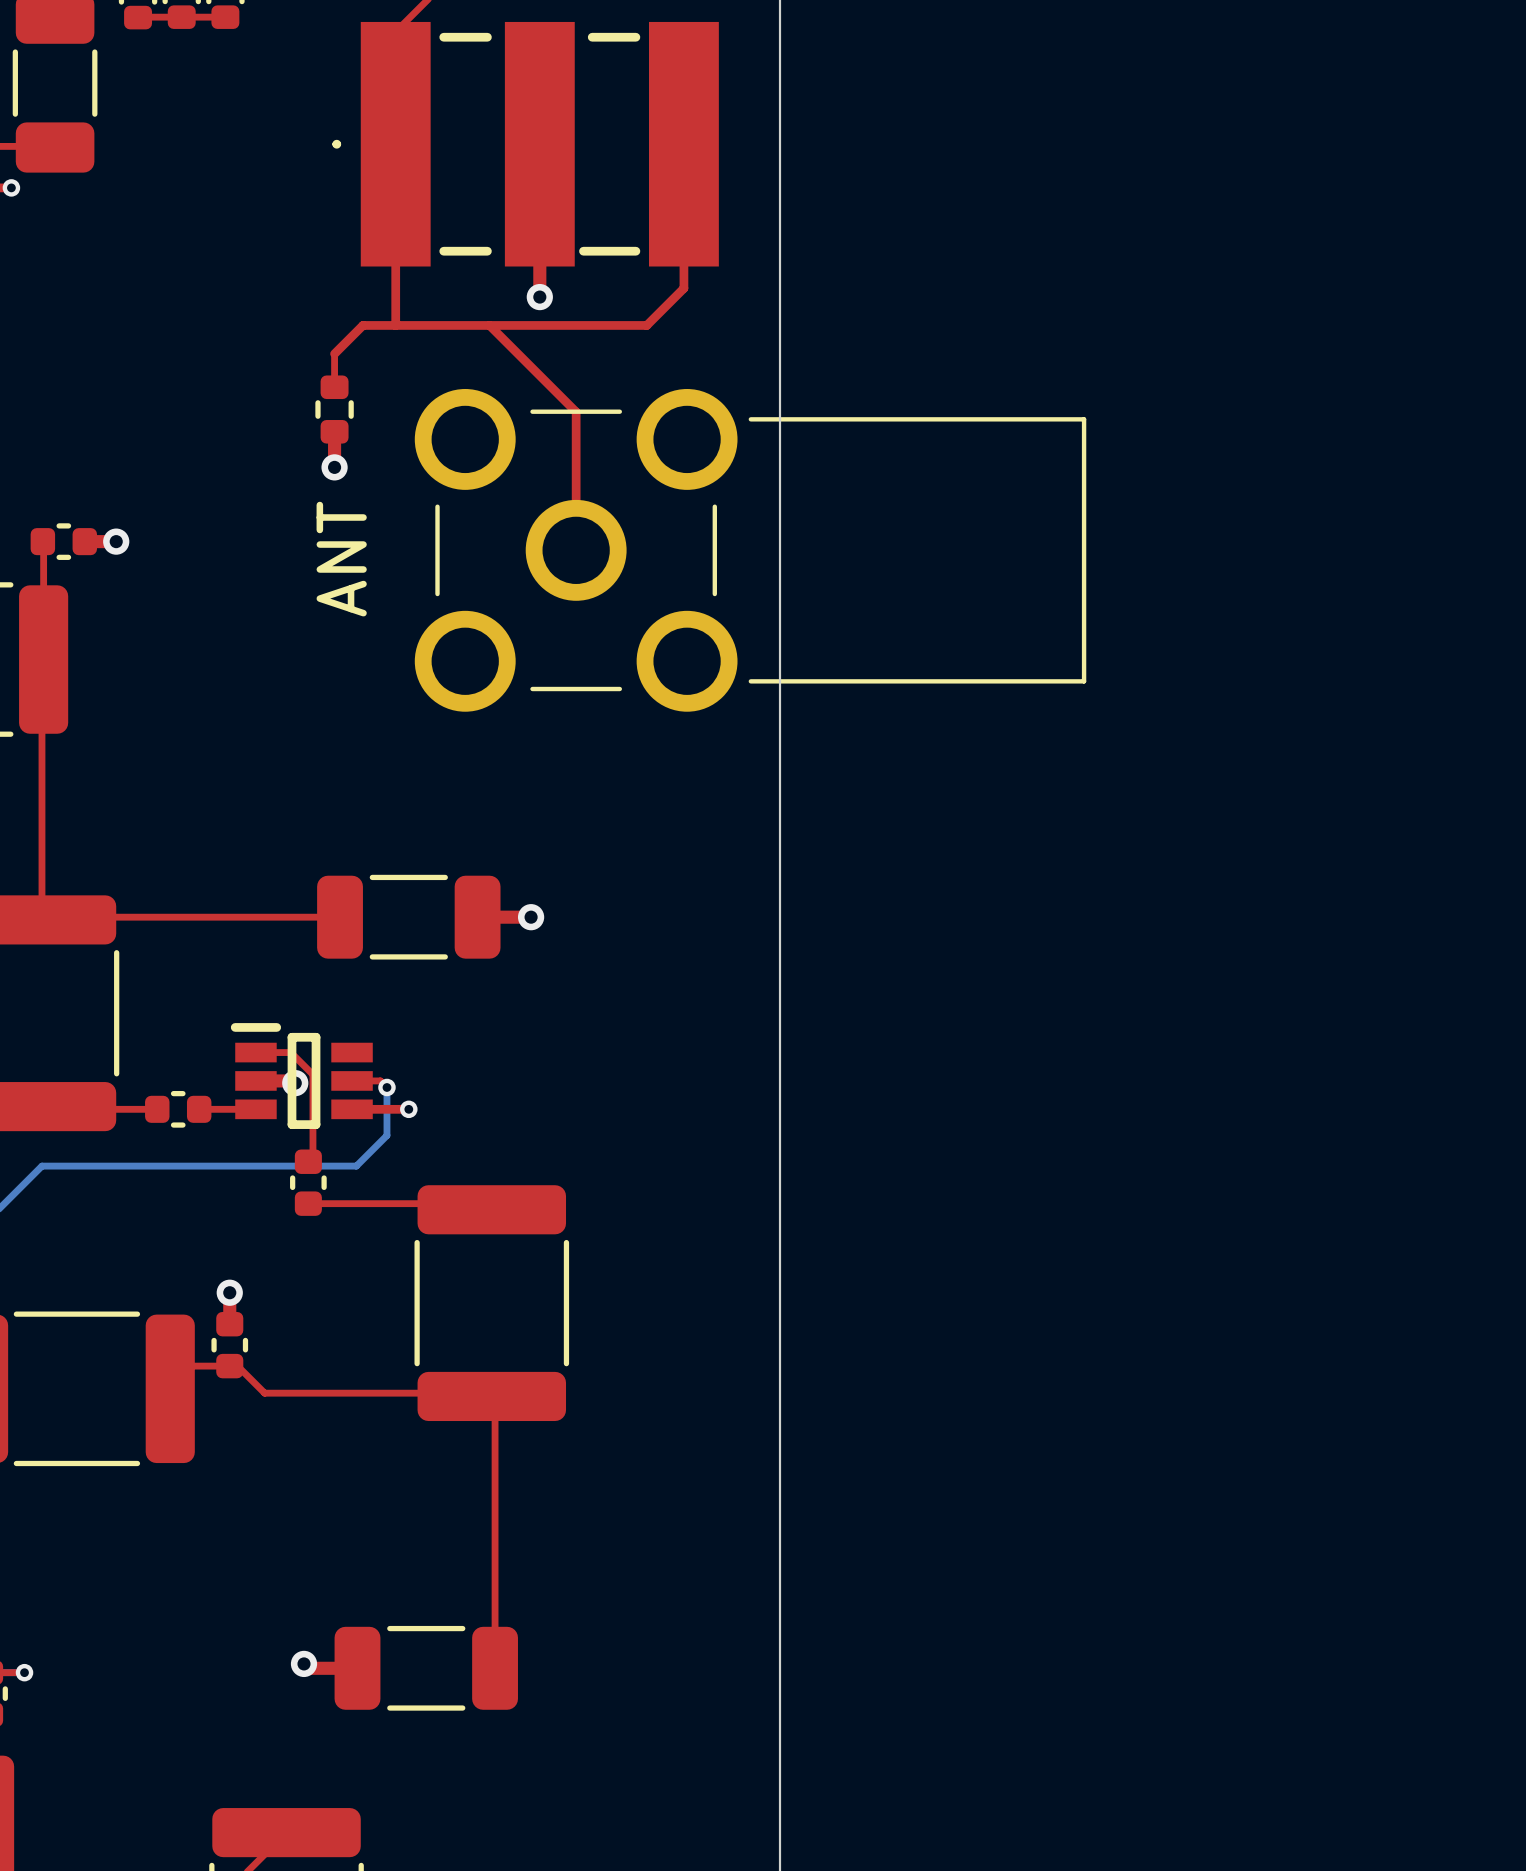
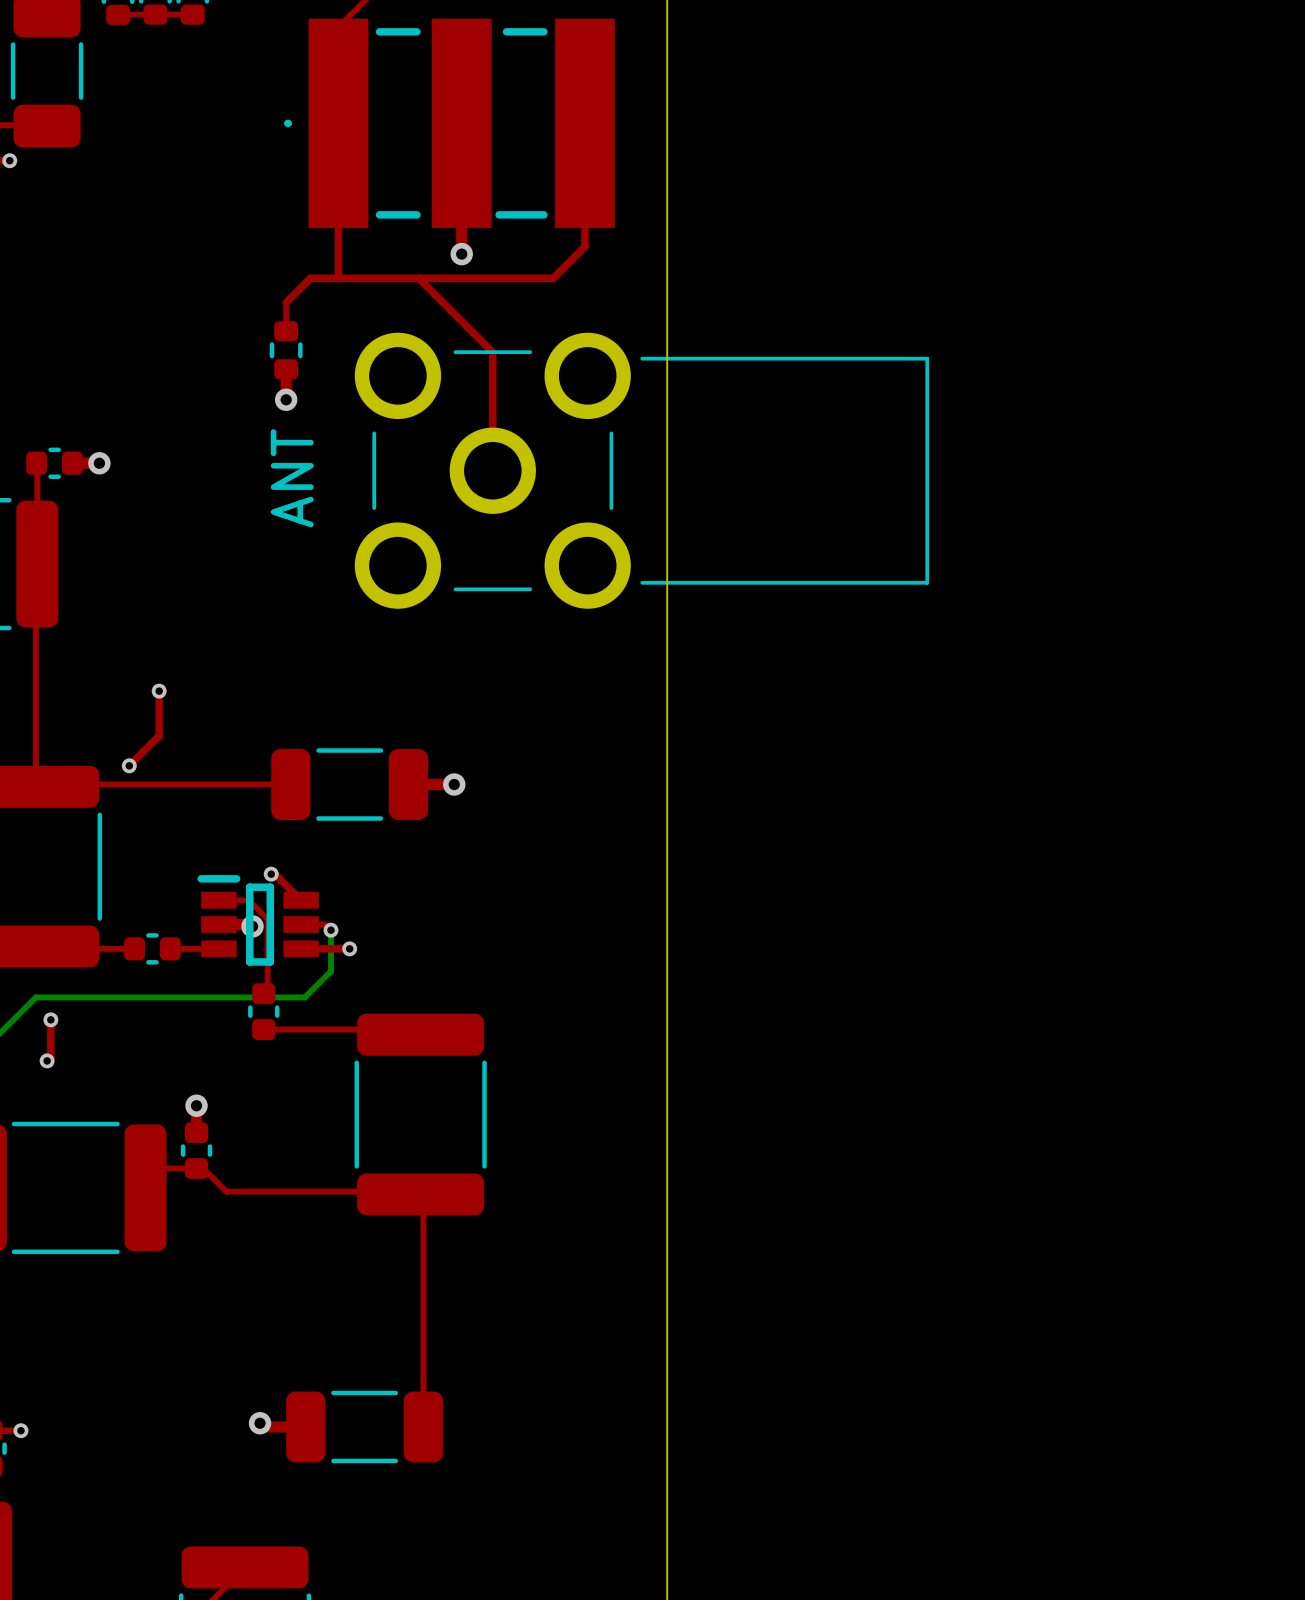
top track: none -> (159, 691) (159, 735) (129, 765)
via: none -> (159, 691)
via: none -> (129, 765)
top track: none -> (271, 874) (274, 874) (301, 900)
via: none -> (271, 874)
top track: none -> (50, 1019) (50, 1057) (47, 1060)
via: none -> (50, 1019)
via: none -> (47, 1060)

